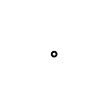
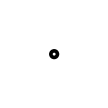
hole: none -> (54, 54)

